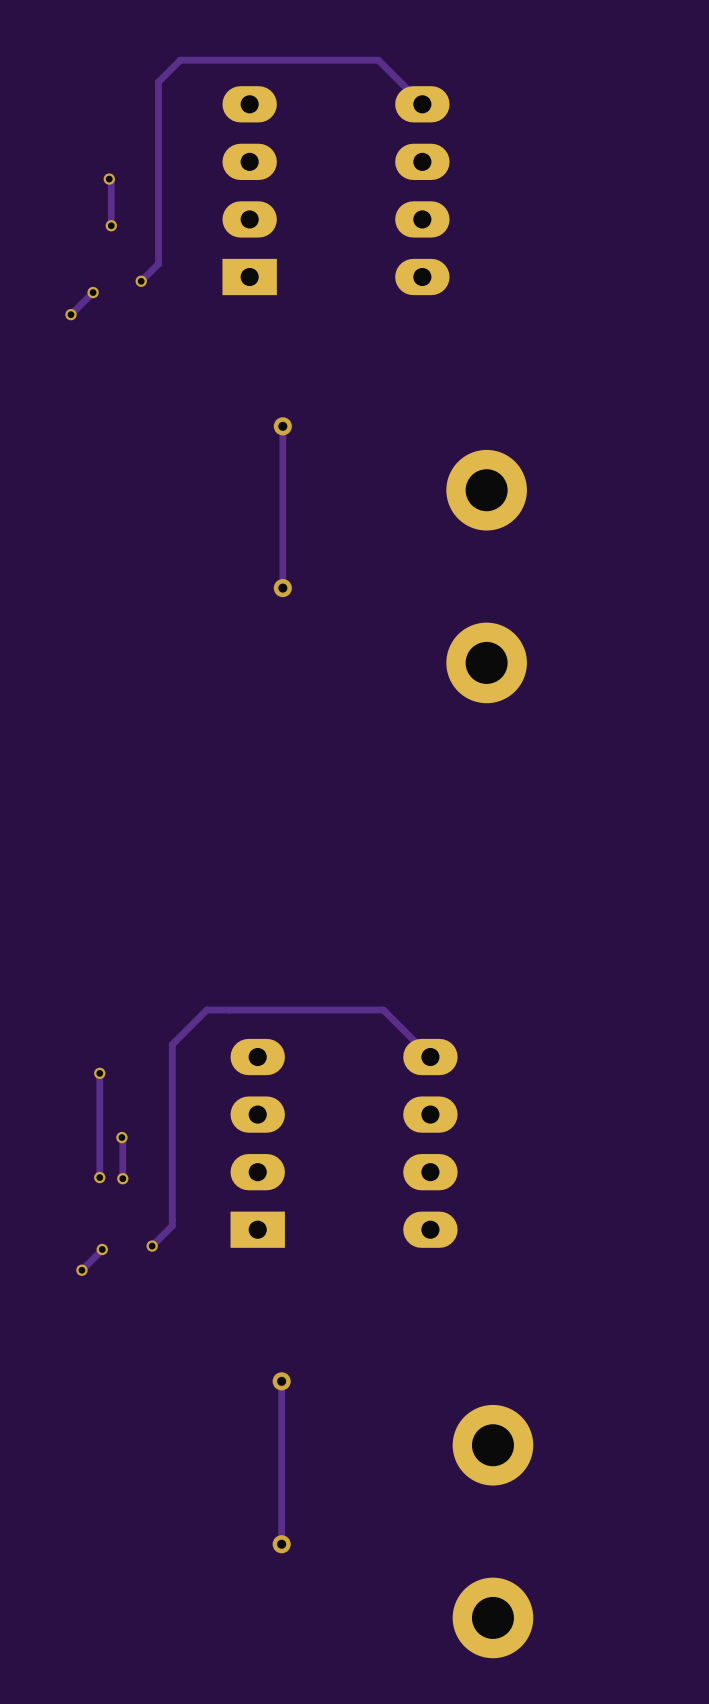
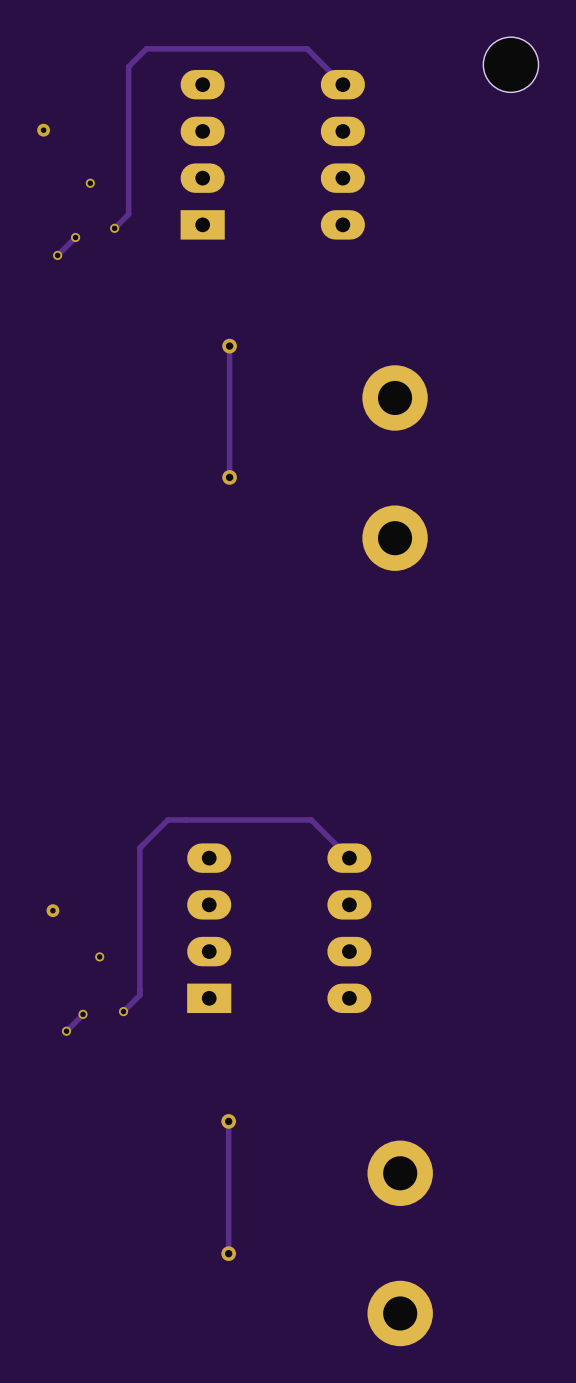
part: none -> (510, 64)
via: none -> (43, 130)
track: (109, 179) (111, 181) (111, 225) -> none
via: (109, 179) -> none
track: (99, 1073) (99, 1177) -> none
via: (99, 1073) -> none
via: none -> (52, 910)
track: (121, 1137) (122, 1178) -> none
via: (121, 1137) -> none
via: (99, 1177) -> none

